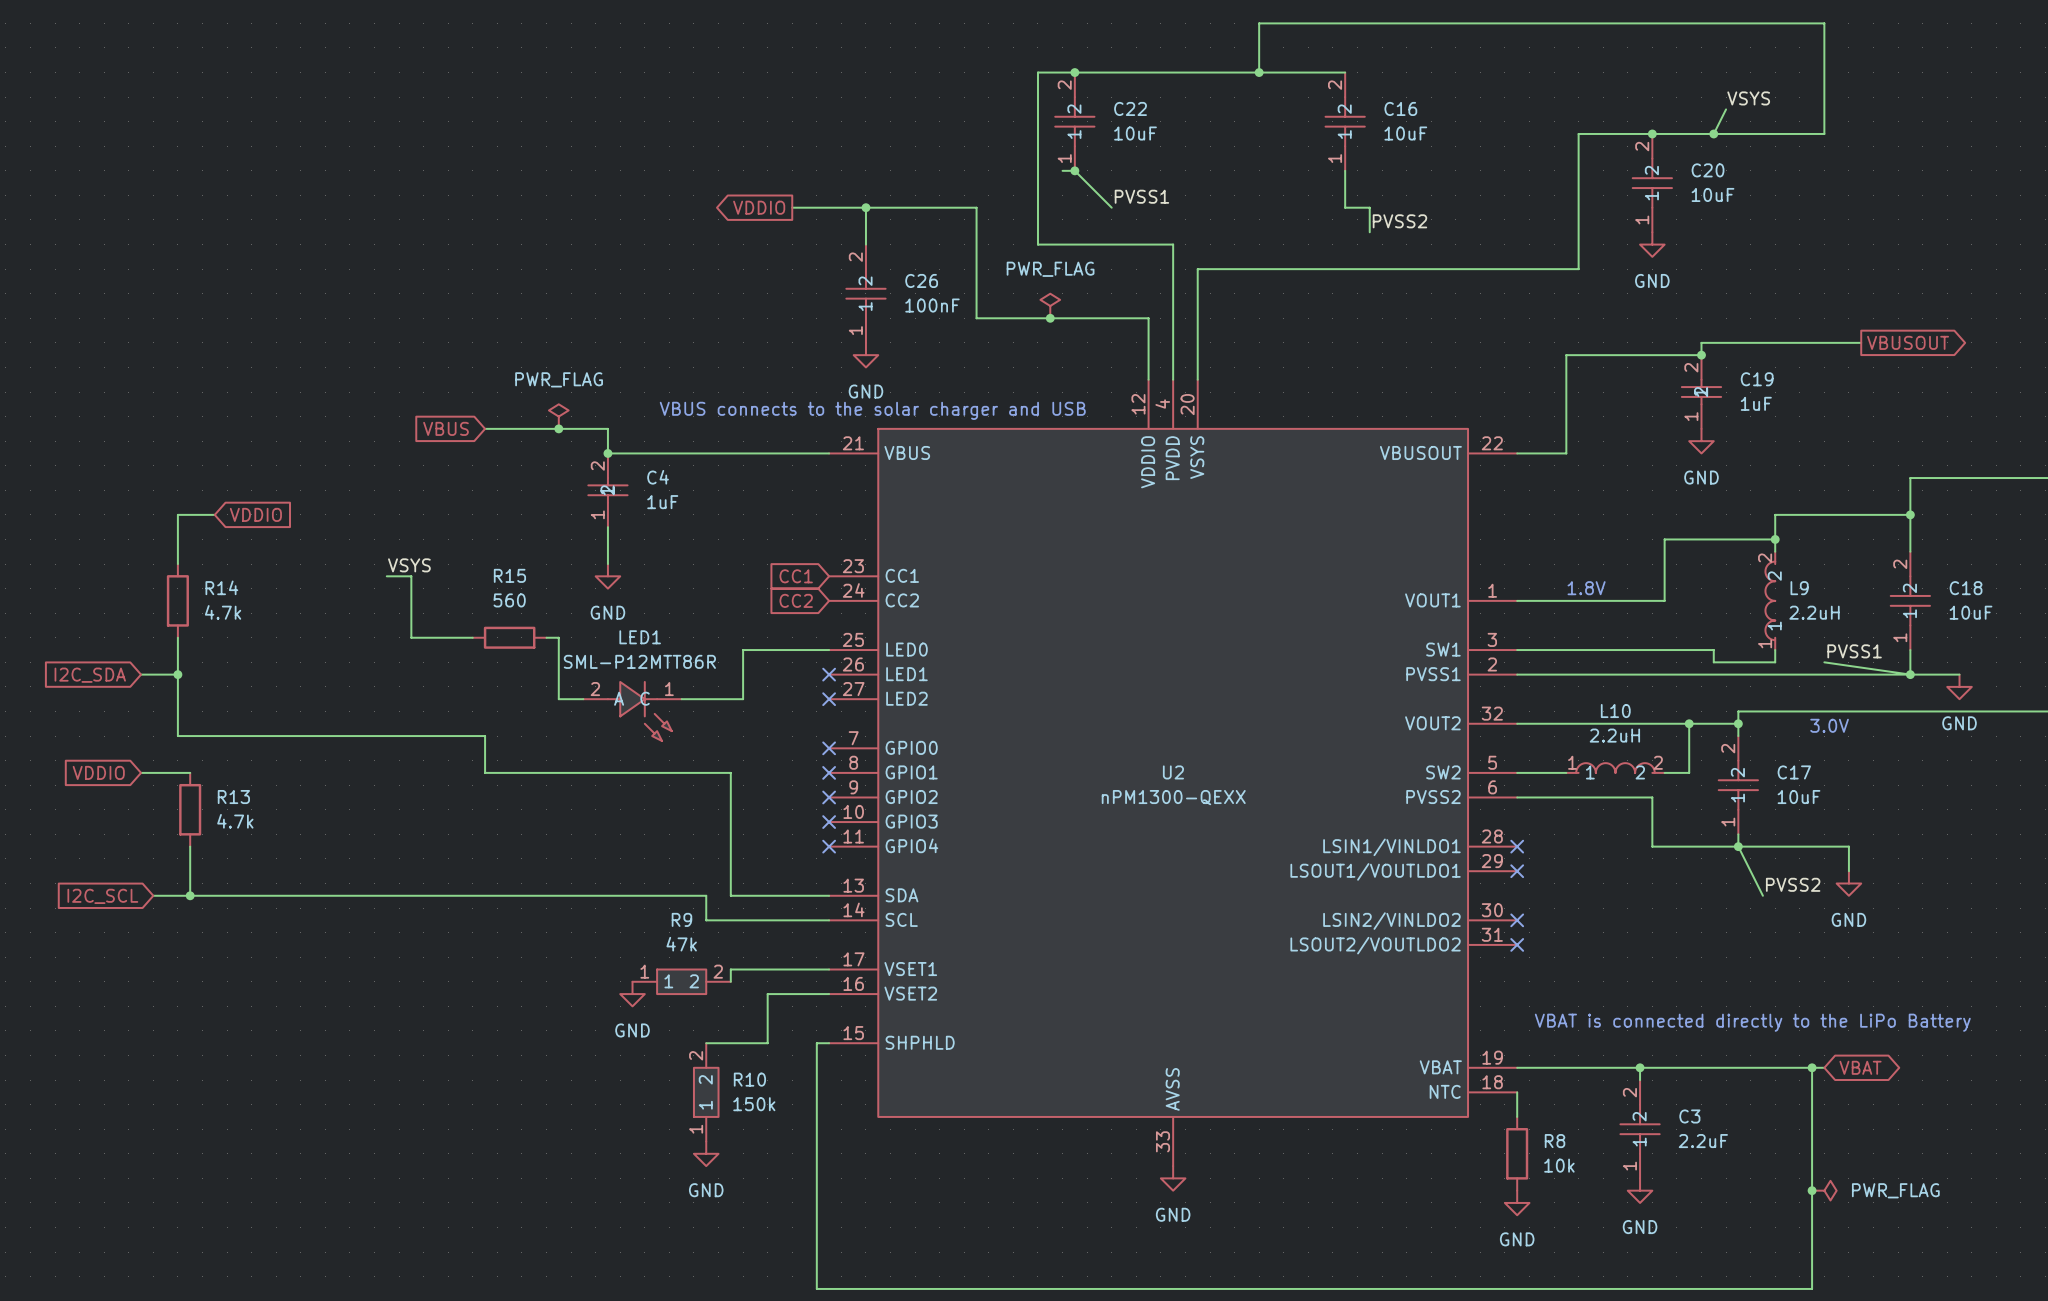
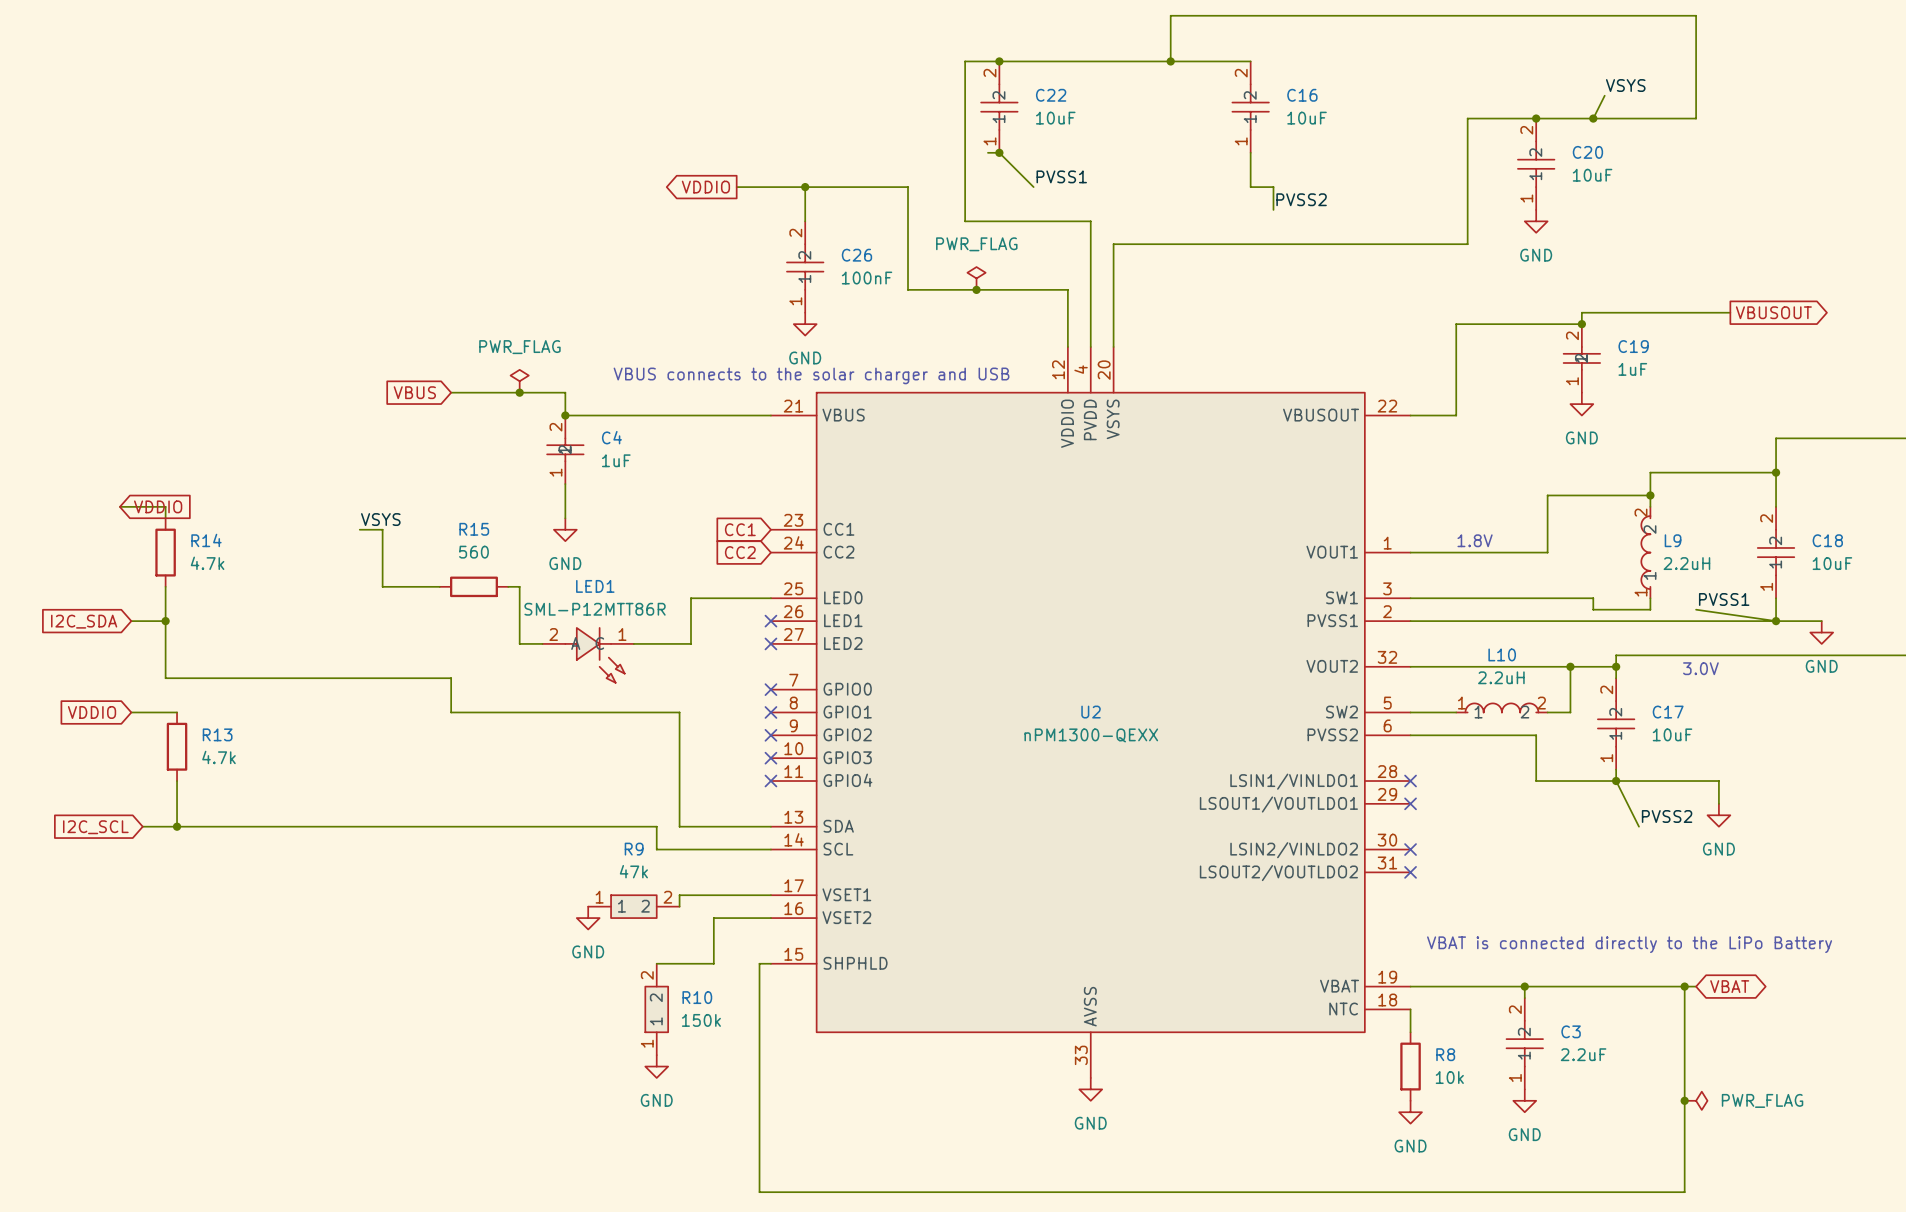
wire: (214, 514) (177, 514) (177, 551) -> (119, 506) (165, 506)
global label position: VDDIO (255, 514) -> VDDIO (158, 506)

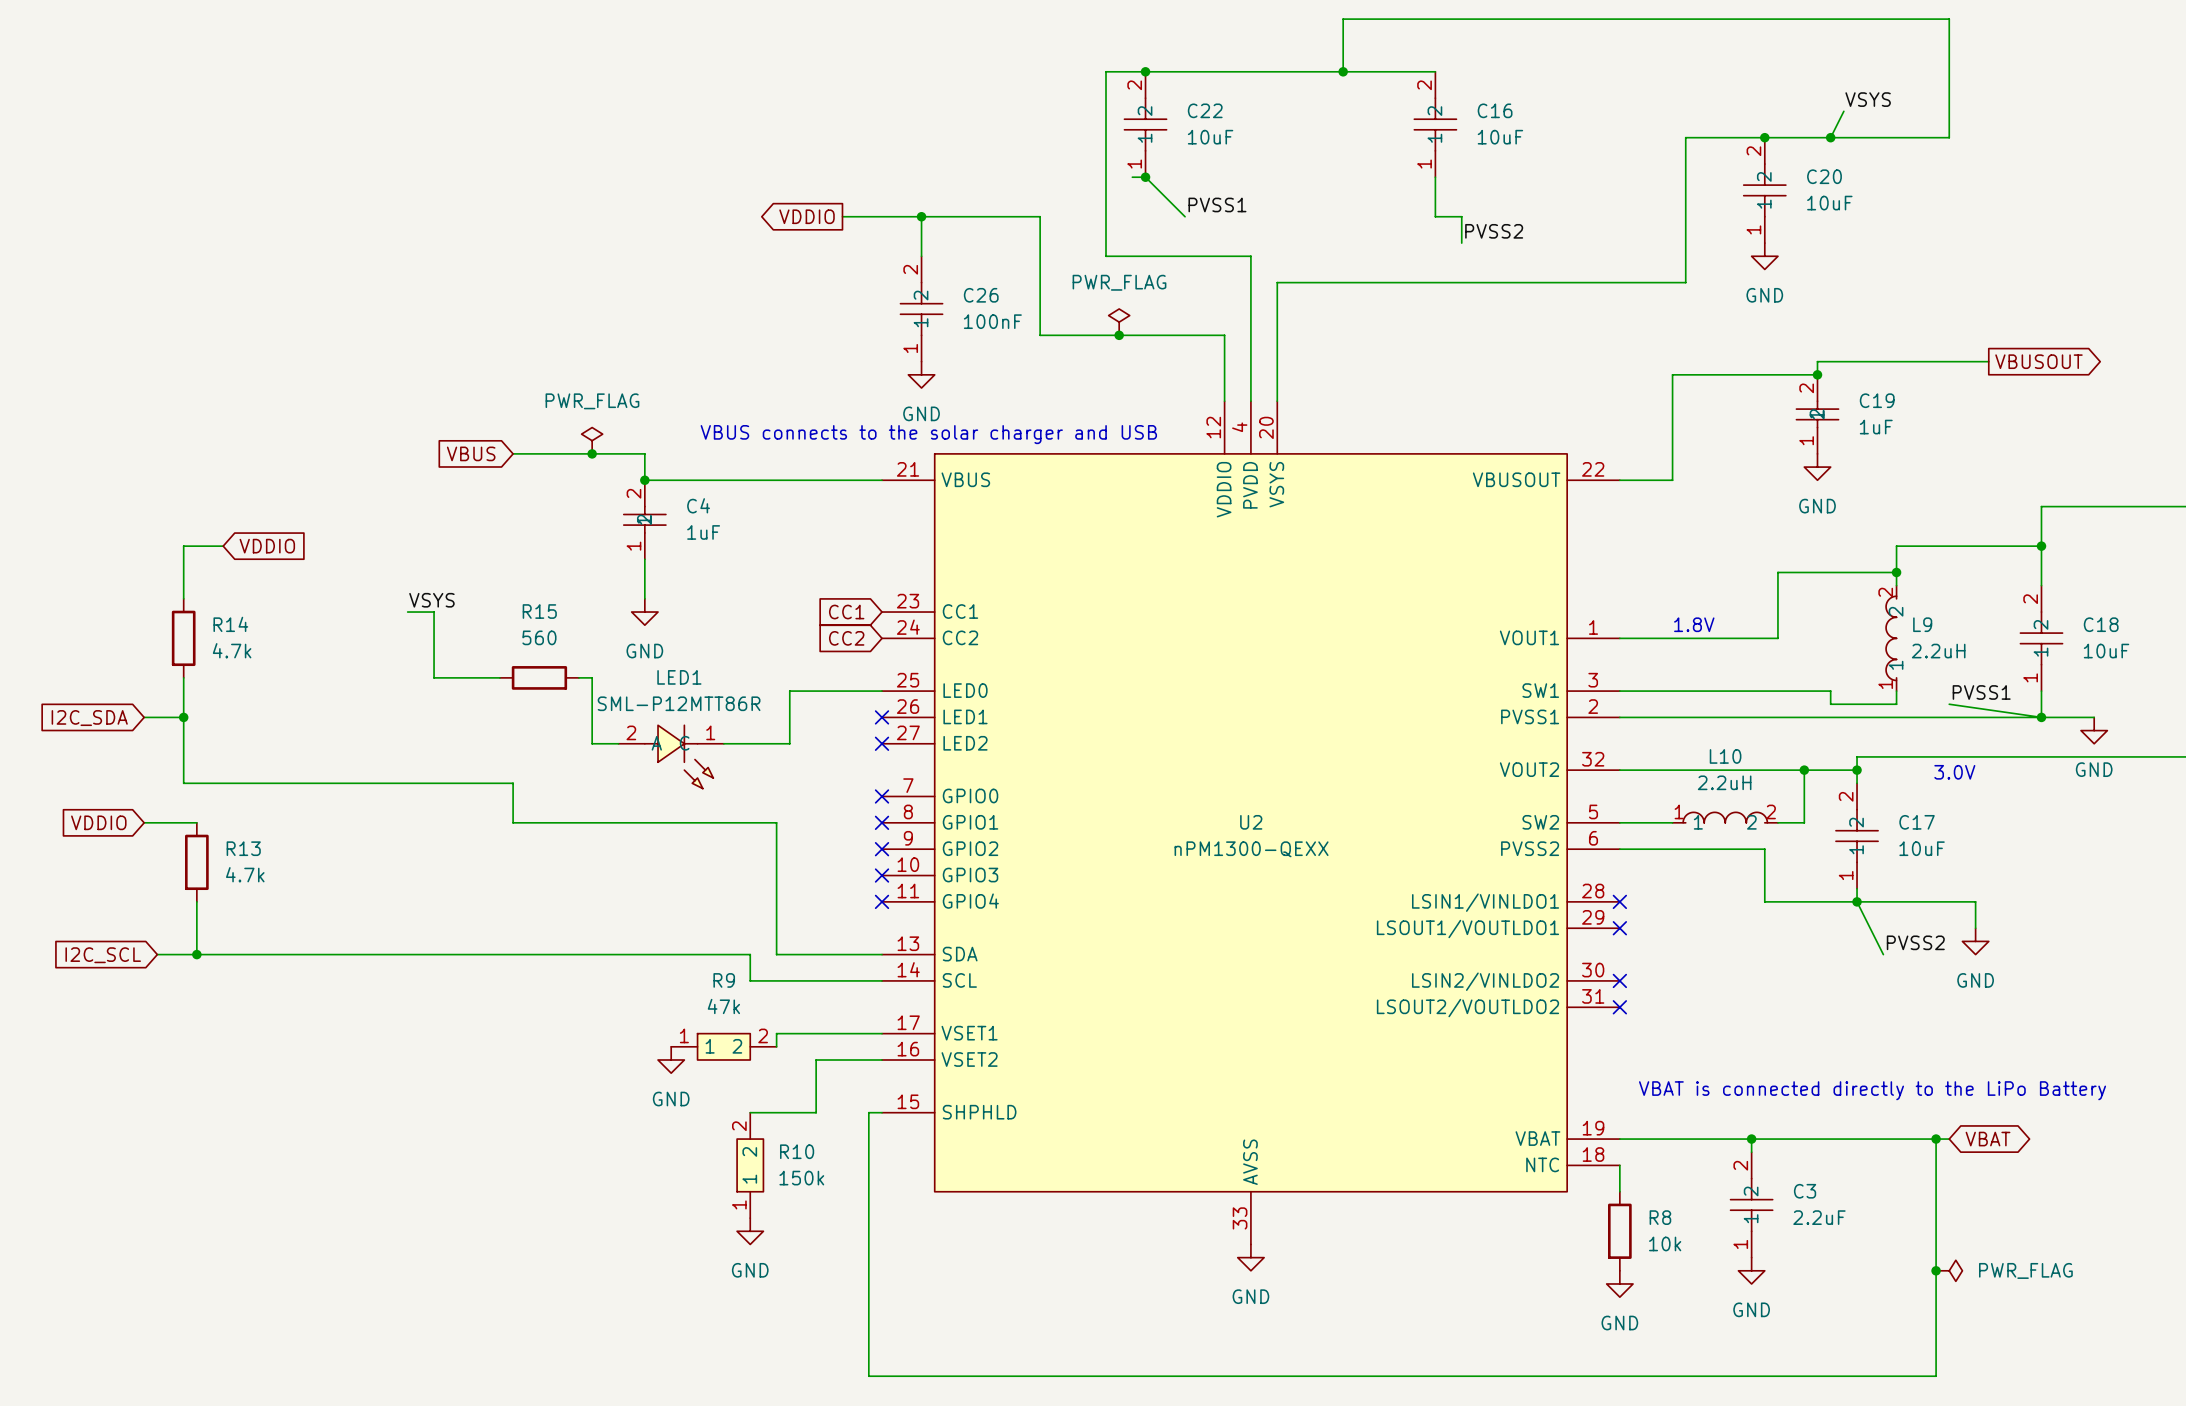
wire: (119, 506) (165, 506) -> (223, 546) (183, 546) (183, 585)
global label position: VDDIO (158, 506) -> VDDIO (267, 546)

